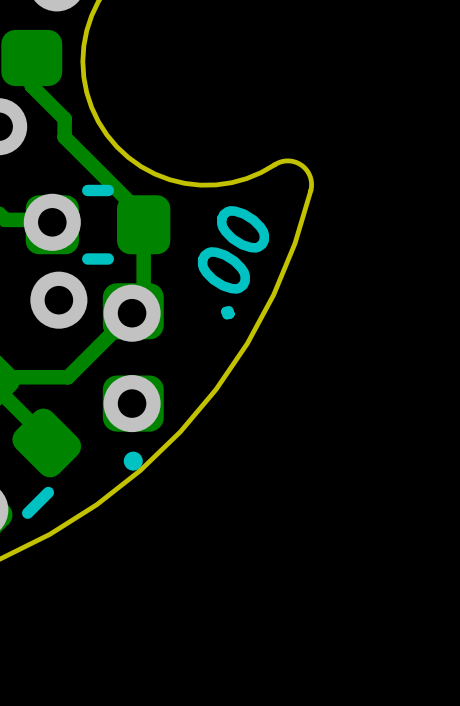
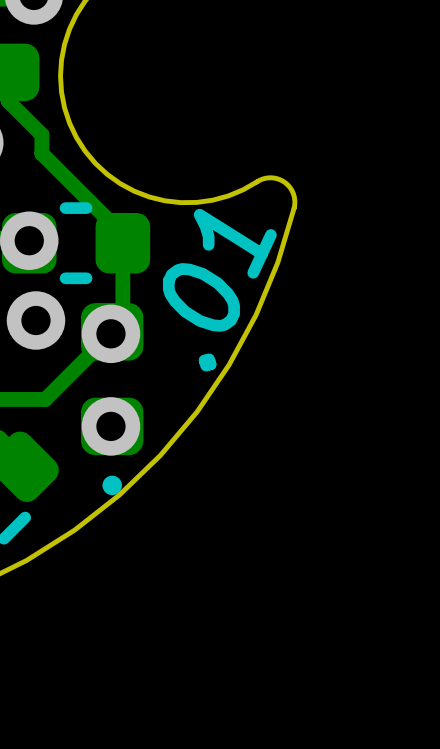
text: .00 (233, 262) -> .01 (219, 290)

